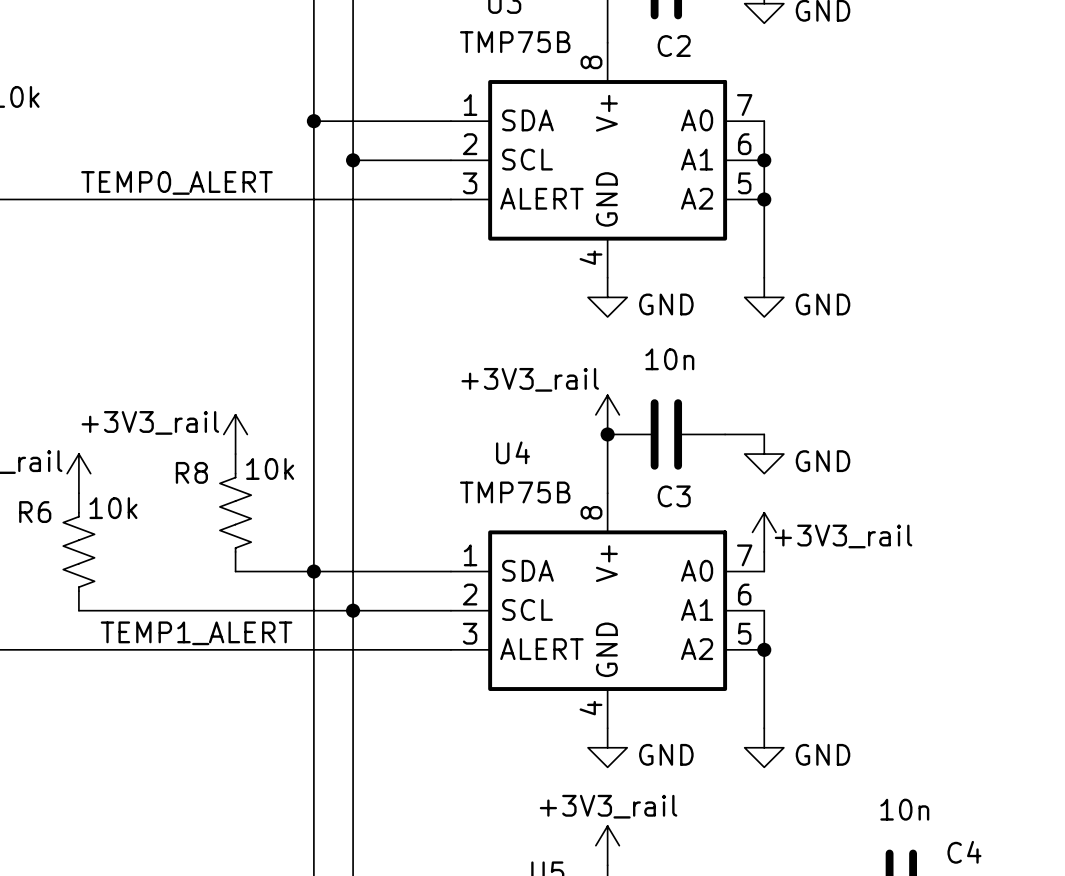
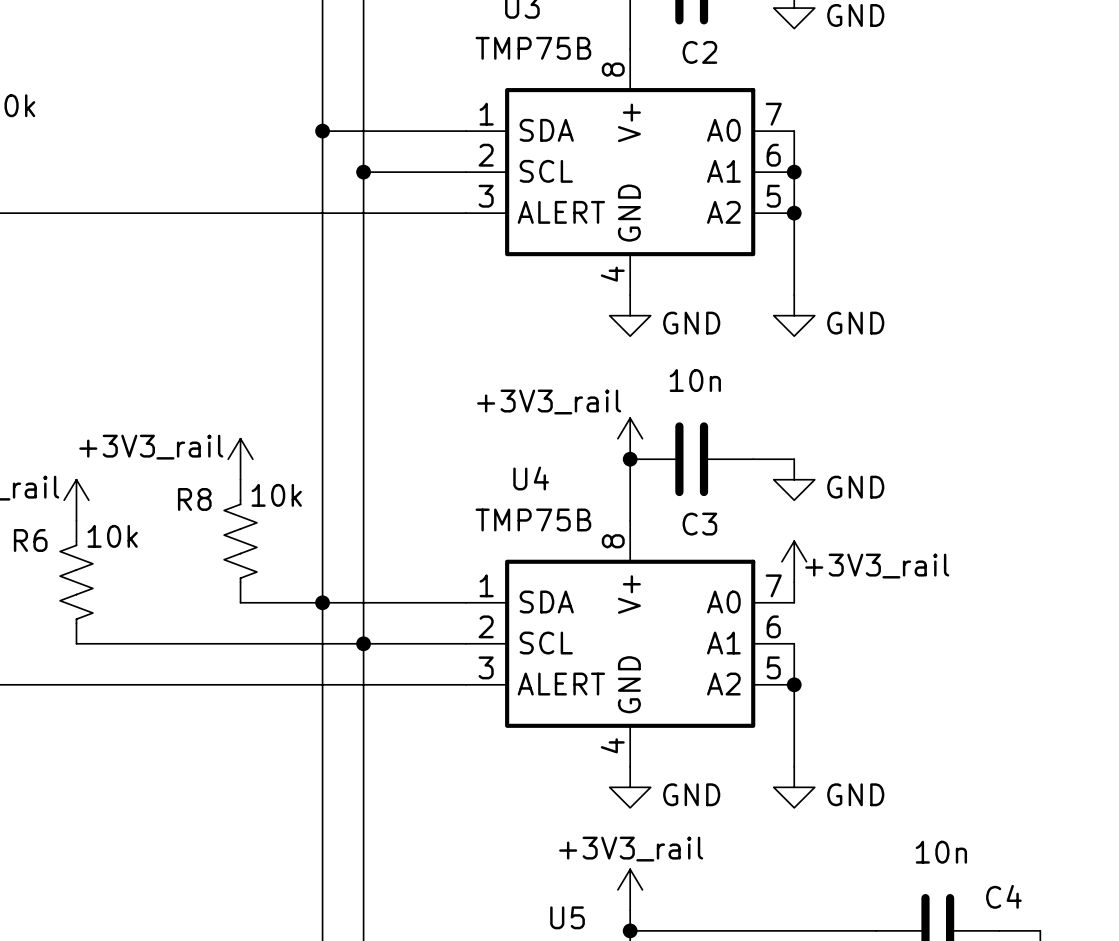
label: TEMP0_ALERT (176, 182) -> none
label: TEMP1_ALERT (196, 633) -> none

